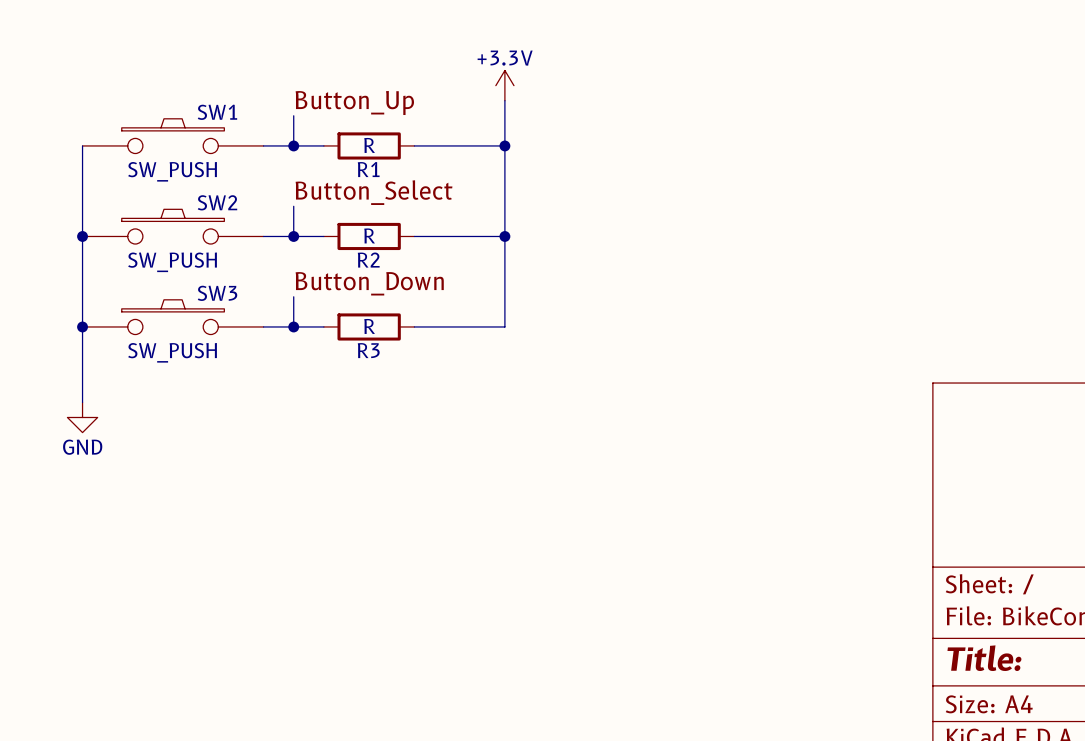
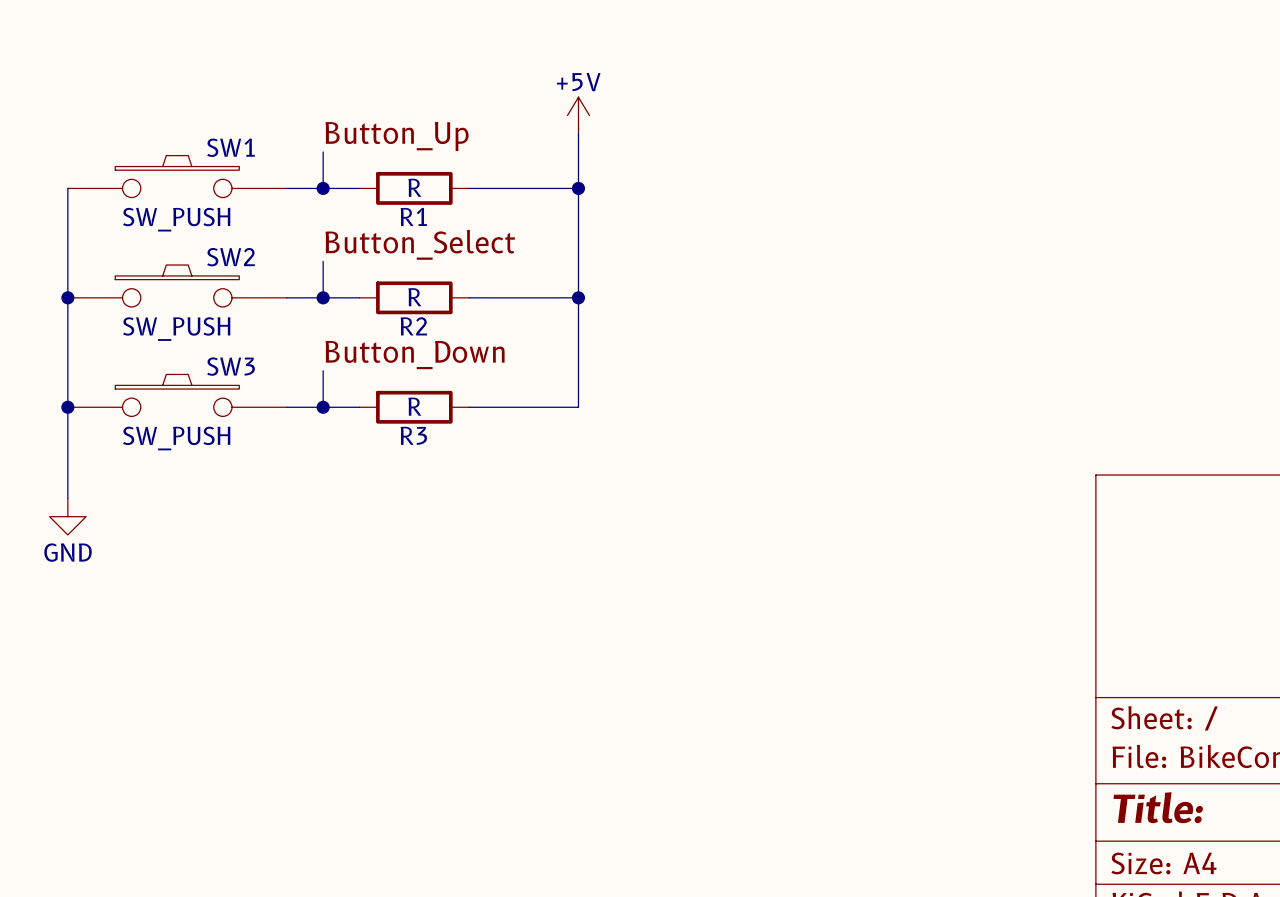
power symbol: +3.3V (504, 85) -> +5V (578, 115)

